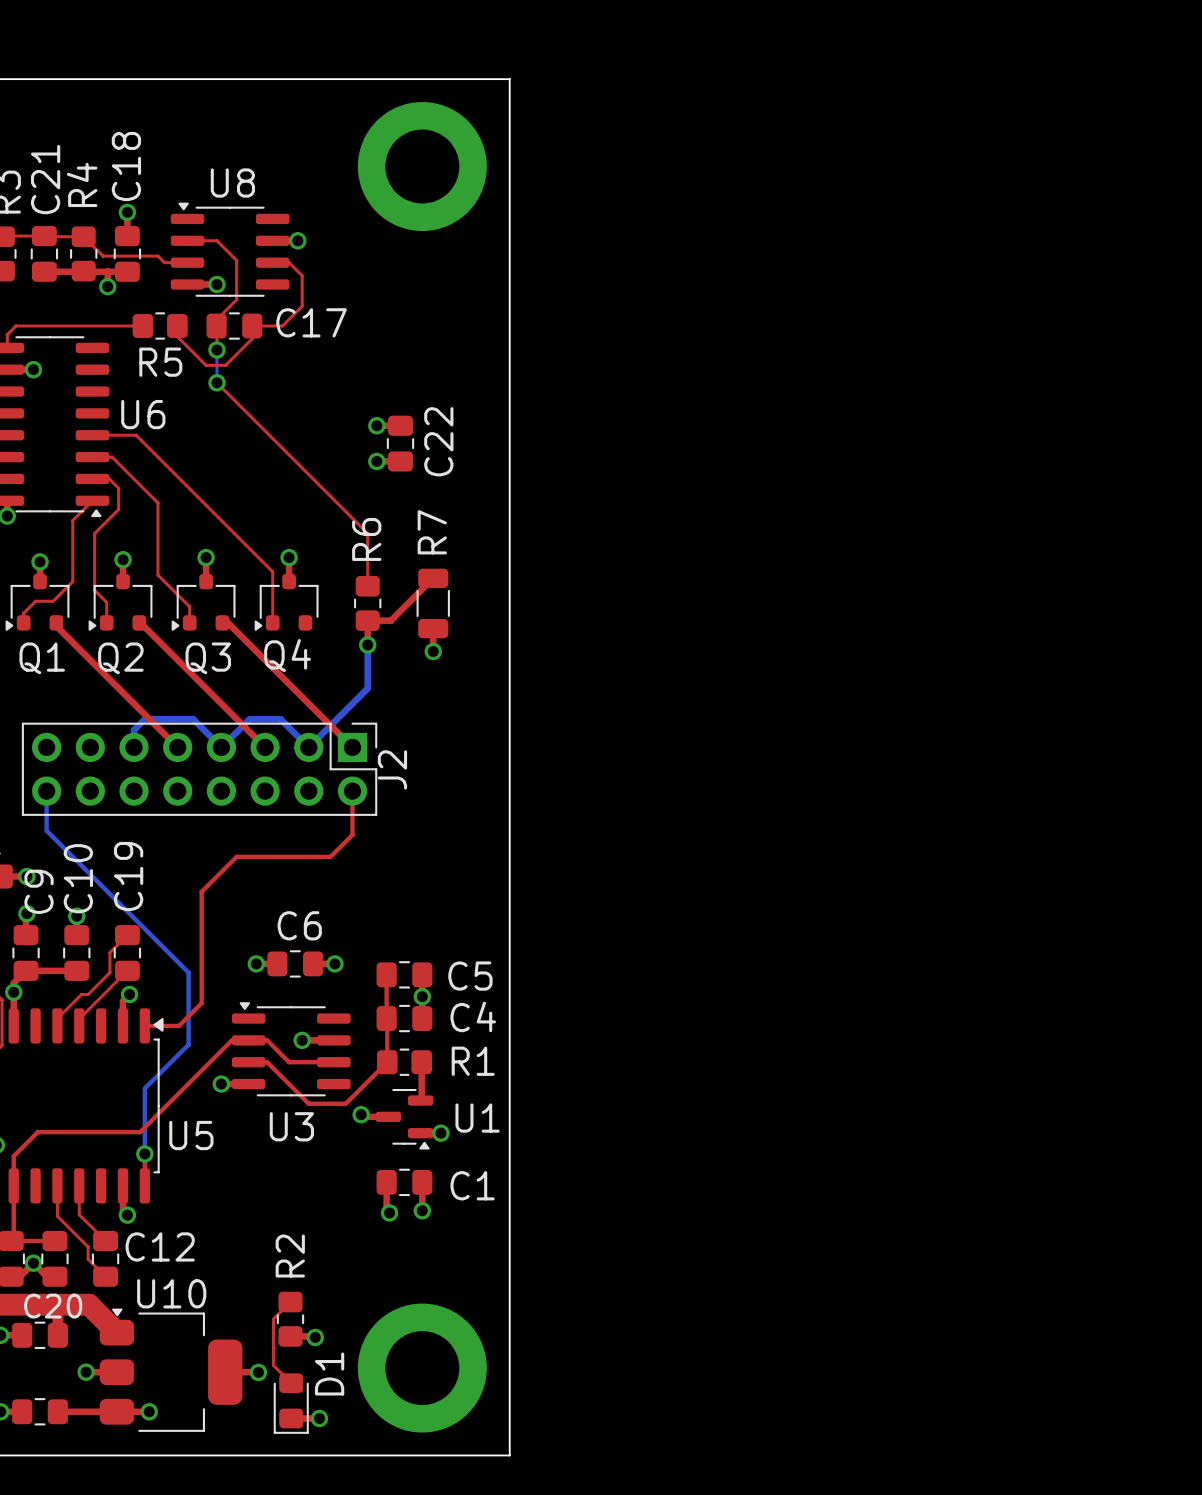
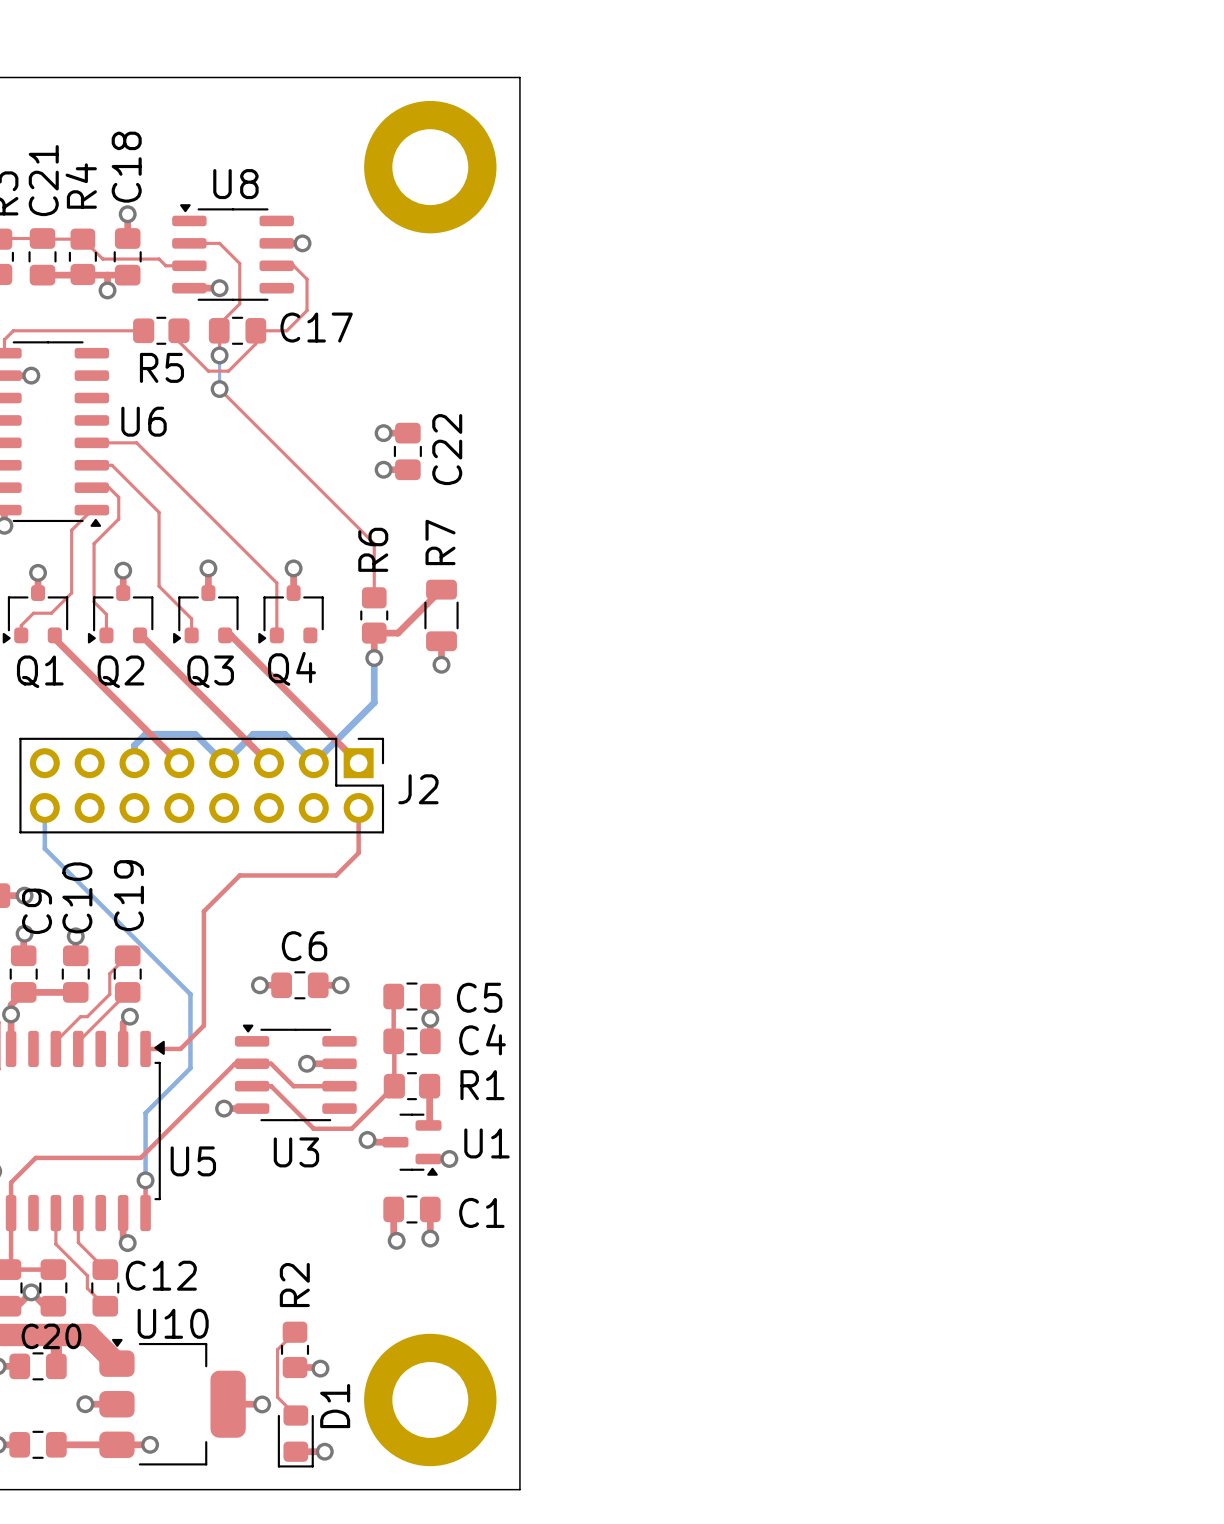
J2 name rotation: 0° (392, 769) -> 90° clockwise (418, 789)

